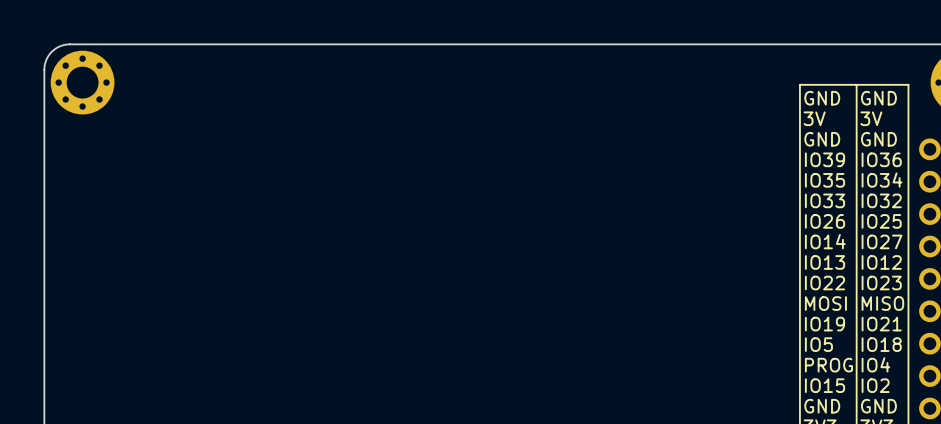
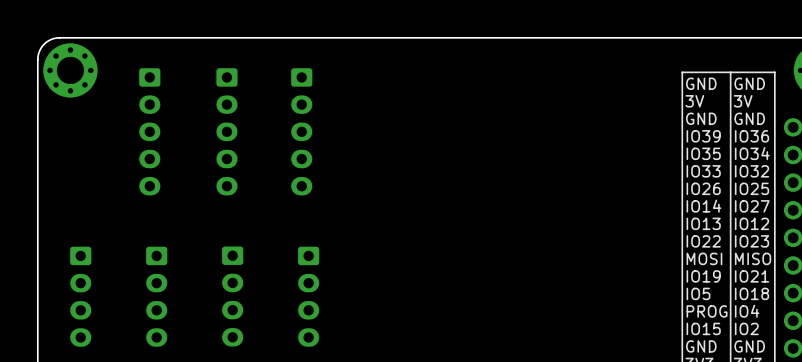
part: none -> (149, 131)
part: none -> (226, 131)
part: none -> (301, 131)
part: none -> (80, 296)
part: none -> (156, 296)
part: none -> (232, 296)
part: none -> (308, 296)

